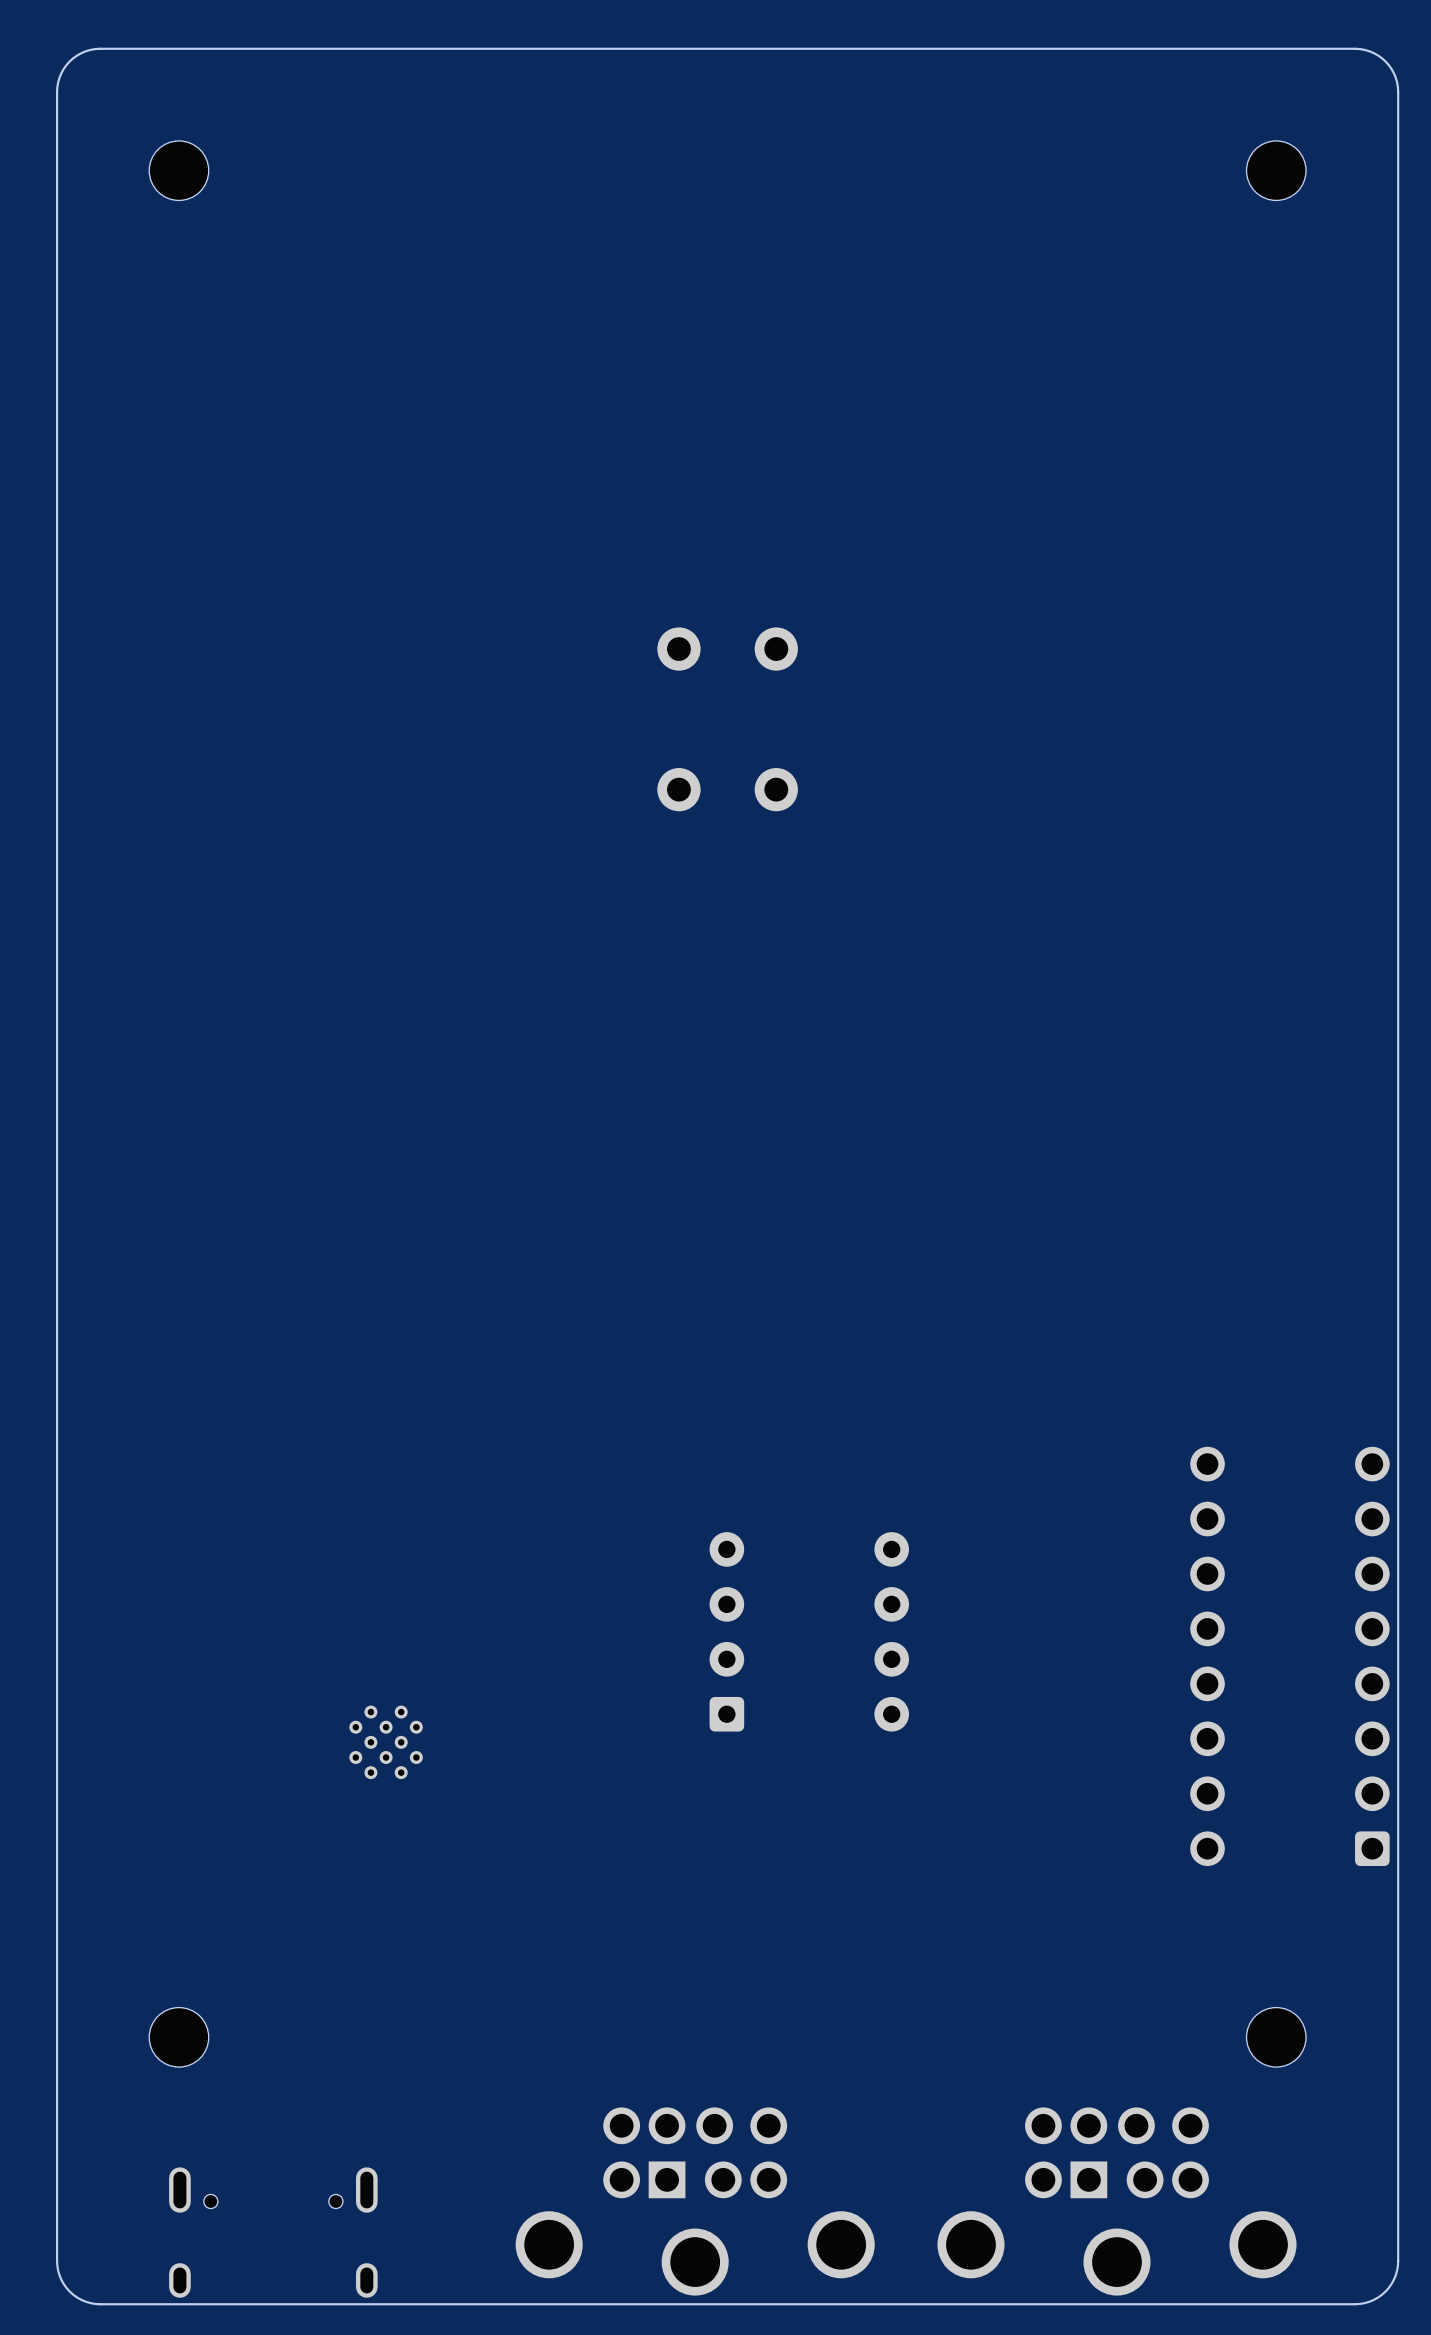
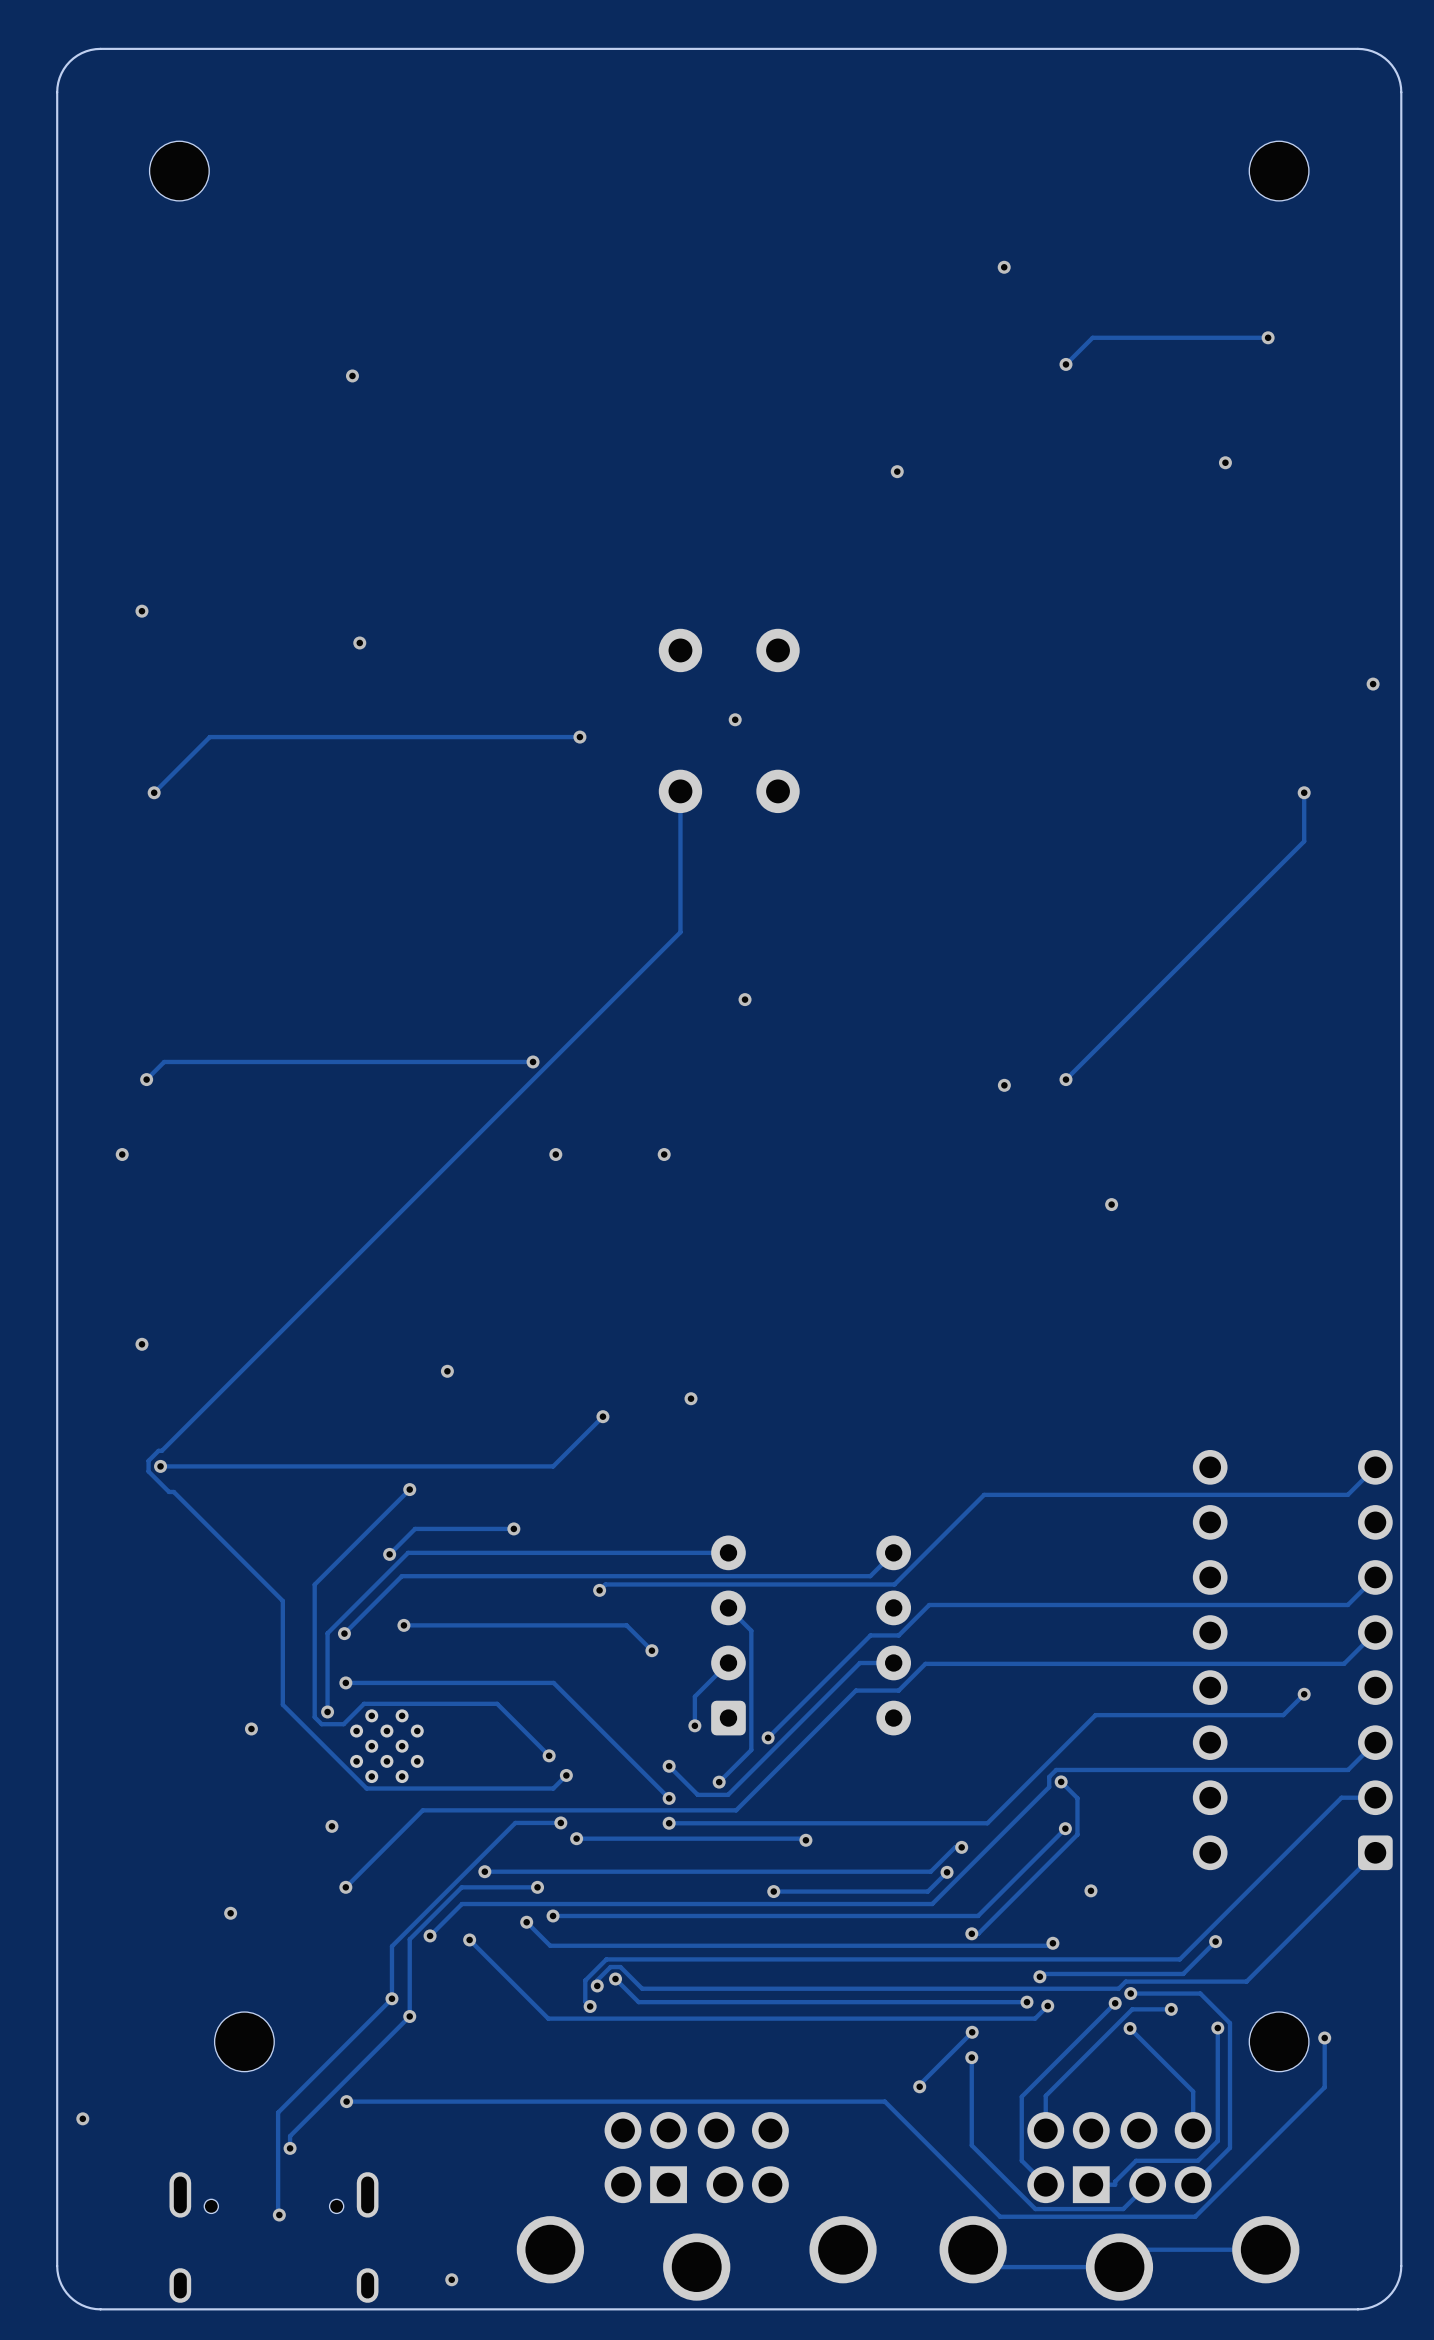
via: none -> (1004, 267)
track: none -> (1268, 337) (1092, 337) (1065, 364)
via: none -> (1268, 337)
via: none -> (1065, 364)
via: none -> (352, 375)
via: none -> (1225, 462)
via: none -> (897, 471)
via: none -> (141, 611)
via: none -> (359, 642)
via: none -> (1373, 684)
via: none -> (735, 719)
track: none -> (579, 737) (209, 737) (154, 792)
via: none -> (579, 737)
track: none -> (680, 791) (680, 932) (161, 1450) (158, 1450) (148, 1460) (148, 1471) (169, 1491) (173, 1491) (282, 1600) (282, 1704) (366, 1788) (553, 1788) (566, 1775)
via: none -> (154, 792)
track: none -> (1304, 792) (1304, 841) (1065, 1079)
via: none -> (1304, 792)
via: none -> (745, 999)
track: none -> (533, 1061) (164, 1061) (146, 1079)
via: none -> (533, 1061)
via: none -> (146, 1079)
via: none -> (1065, 1079)
via: none -> (1004, 1085)
via: none -> (122, 1154)
via: none -> (555, 1154)
via: none -> (664, 1154)
via: none -> (1111, 1204)
via: none -> (141, 1344)
via: none -> (447, 1371)
via: none -> (691, 1398)
track: none -> (602, 1416) (553, 1466) (160, 1466)
via: none -> (602, 1416)
via: none -> (160, 1466)
track: none -> (1375, 1467) (1347, 1494) (984, 1494) (894, 1584) (605, 1584) (599, 1590)
track: none -> (409, 1489) (314, 1584) (314, 1717) (321, 1724) (343, 1724) (364, 1703) (497, 1703) (549, 1755)
via: none -> (409, 1489)
track: none -> (513, 1528) (415, 1528) (389, 1554)
via: none -> (513, 1528)
track: none -> (728, 1552) (408, 1552) (327, 1633) (327, 1712)
track: none -> (893, 1552) (870, 1576) (401, 1576) (344, 1633)
via: none -> (389, 1554)
track: none -> (1375, 1577) (1347, 1605) (929, 1605) (898, 1635) (870, 1635) (768, 1737)
via: none -> (599, 1590)
track: none -> (728, 1607) (751, 1630) (751, 1749) (719, 1782)
track: none -> (403, 1625) (626, 1625) (651, 1650)
via: none -> (403, 1625)
track: none -> (1375, 1632) (1344, 1663) (925, 1663) (898, 1690) (855, 1690) (736, 1810) (422, 1810) (345, 1887)
via: none -> (344, 1633)
via: none -> (651, 1650)
track: none -> (728, 1662) (694, 1696) (694, 1725)
track: none -> (893, 1662) (859, 1662) (728, 1794) (697, 1794) (669, 1766)
track: none -> (345, 1682) (553, 1682) (669, 1798)
via: none -> (345, 1682)
track: none -> (1304, 1694) (1283, 1715) (1095, 1715) (987, 1823) (669, 1823)
via: none -> (1304, 1694)
via: none -> (327, 1712)
via: none -> (694, 1725)
via: none -> (251, 1728)
via: none -> (768, 1737)
track: none -> (1375, 1742) (1348, 1769) (1056, 1769) (1049, 1776) (1049, 1787) (932, 1904) (461, 1904) (430, 1935)
via: none -> (549, 1755)
via: none -> (669, 1766)
via: none -> (566, 1775)
track: none -> (1061, 1781) (1077, 1798) (1077, 1834) (978, 1933) (971, 1933)
via: none -> (1061, 1781)
via: none -> (719, 1782)
track: none -> (1375, 1797) (1341, 1797) (1179, 1959) (606, 1959) (585, 1980) (585, 2001) (590, 2006)
via: none -> (669, 1798)
track: none -> (560, 1822) (515, 1822) (391, 1946) (391, 1998) (278, 2112) (279, 2215)
via: none -> (560, 1822)
via: none -> (669, 1823)
via: none -> (331, 1826)
track: none -> (1065, 1828) (978, 1915) (553, 1915)
via: none -> (1065, 1828)
track: none -> (576, 1838) (804, 1838) (805, 1840)
via: none -> (576, 1838)
via: none -> (805, 1840)
track: none -> (961, 1847) (955, 1847) (930, 1871) (484, 1871)
via: none -> (961, 1847)
track: none -> (1375, 1852) (1246, 1981) (1125, 1981) (1118, 1988) (642, 1988) (620, 1967) (610, 1967) (597, 1980) (597, 1985)
via: none -> (484, 1871)
track: none -> (947, 1872) (927, 1891) (773, 1891)
via: none -> (947, 1872)
via: none -> (345, 1887)
track: none -> (537, 1887) (461, 1887) (409, 1939) (409, 2016) (290, 2136) (290, 2148)
via: none -> (537, 1887)
via: none -> (1090, 1890)
via: none -> (773, 1891)
via: none -> (230, 1913)
via: none -> (553, 1915)
track: none -> (526, 1922) (550, 1945) (1050, 1945) (1052, 1943)
via: none -> (526, 1922)
via: none -> (971, 1933)
via: none -> (430, 1935)
track: none -> (469, 1939) (548, 2018) (1035, 2018) (1047, 2006)
via: none -> (469, 1939)
track: none -> (1215, 1941) (1183, 1973) (1042, 1973) (1039, 1976)
via: none -> (1215, 1941)
via: none -> (1052, 1943)
via: none -> (1039, 1976)
track: none -> (615, 1979) (638, 2002) (1026, 2002)
via: none -> (615, 1979)
via: none -> (597, 1985)
track: none -> (1130, 1993) (1200, 1993) (1229, 2023) (1229, 2147) (1193, 2184)
via: none -> (1130, 1993)
via: none -> (391, 1998)
via: none -> (1026, 2002)
track: none -> (1115, 2003) (1021, 2096) (1021, 2160) (1045, 2184)
via: none -> (1115, 2003)
via: none -> (1047, 2006)
via: none -> (590, 2006)
track: none -> (1171, 2009) (1132, 2009) (1045, 2095) (1045, 2130)
via: none -> (1171, 2009)
via: none -> (409, 2016)
track: none -> (1217, 2028) (1217, 2141) (1197, 2160) (1136, 2160) (1115, 2181) (1115, 2184) (1091, 2184)
via: none -> (1217, 2028)
track: none -> (1130, 2028) (1193, 2091) (1193, 2130)
via: none -> (1130, 2028)
track: none -> (972, 2032) (919, 2086)
via: none -> (972, 2032)
track: none -> (1324, 2037) (1324, 2087) (1195, 2216) (1000, 2216) (884, 2101) (346, 2101)
via: none -> (1324, 2037)
part position: (178, 2037) -> (244, 2041)
track: none -> (971, 2057) (971, 2145) (1035, 2209) (1123, 2209) (1147, 2184)
via: none -> (971, 2057)
via: none -> (919, 2086)
via: none -> (346, 2101)
via: none -> (82, 2118)
via: none -> (290, 2148)
via: none -> (279, 2215)
track: none -> (1265, 2249) (1136, 2249) (1119, 2267) (990, 2267) (973, 2249)
via: none -> (451, 2279)

